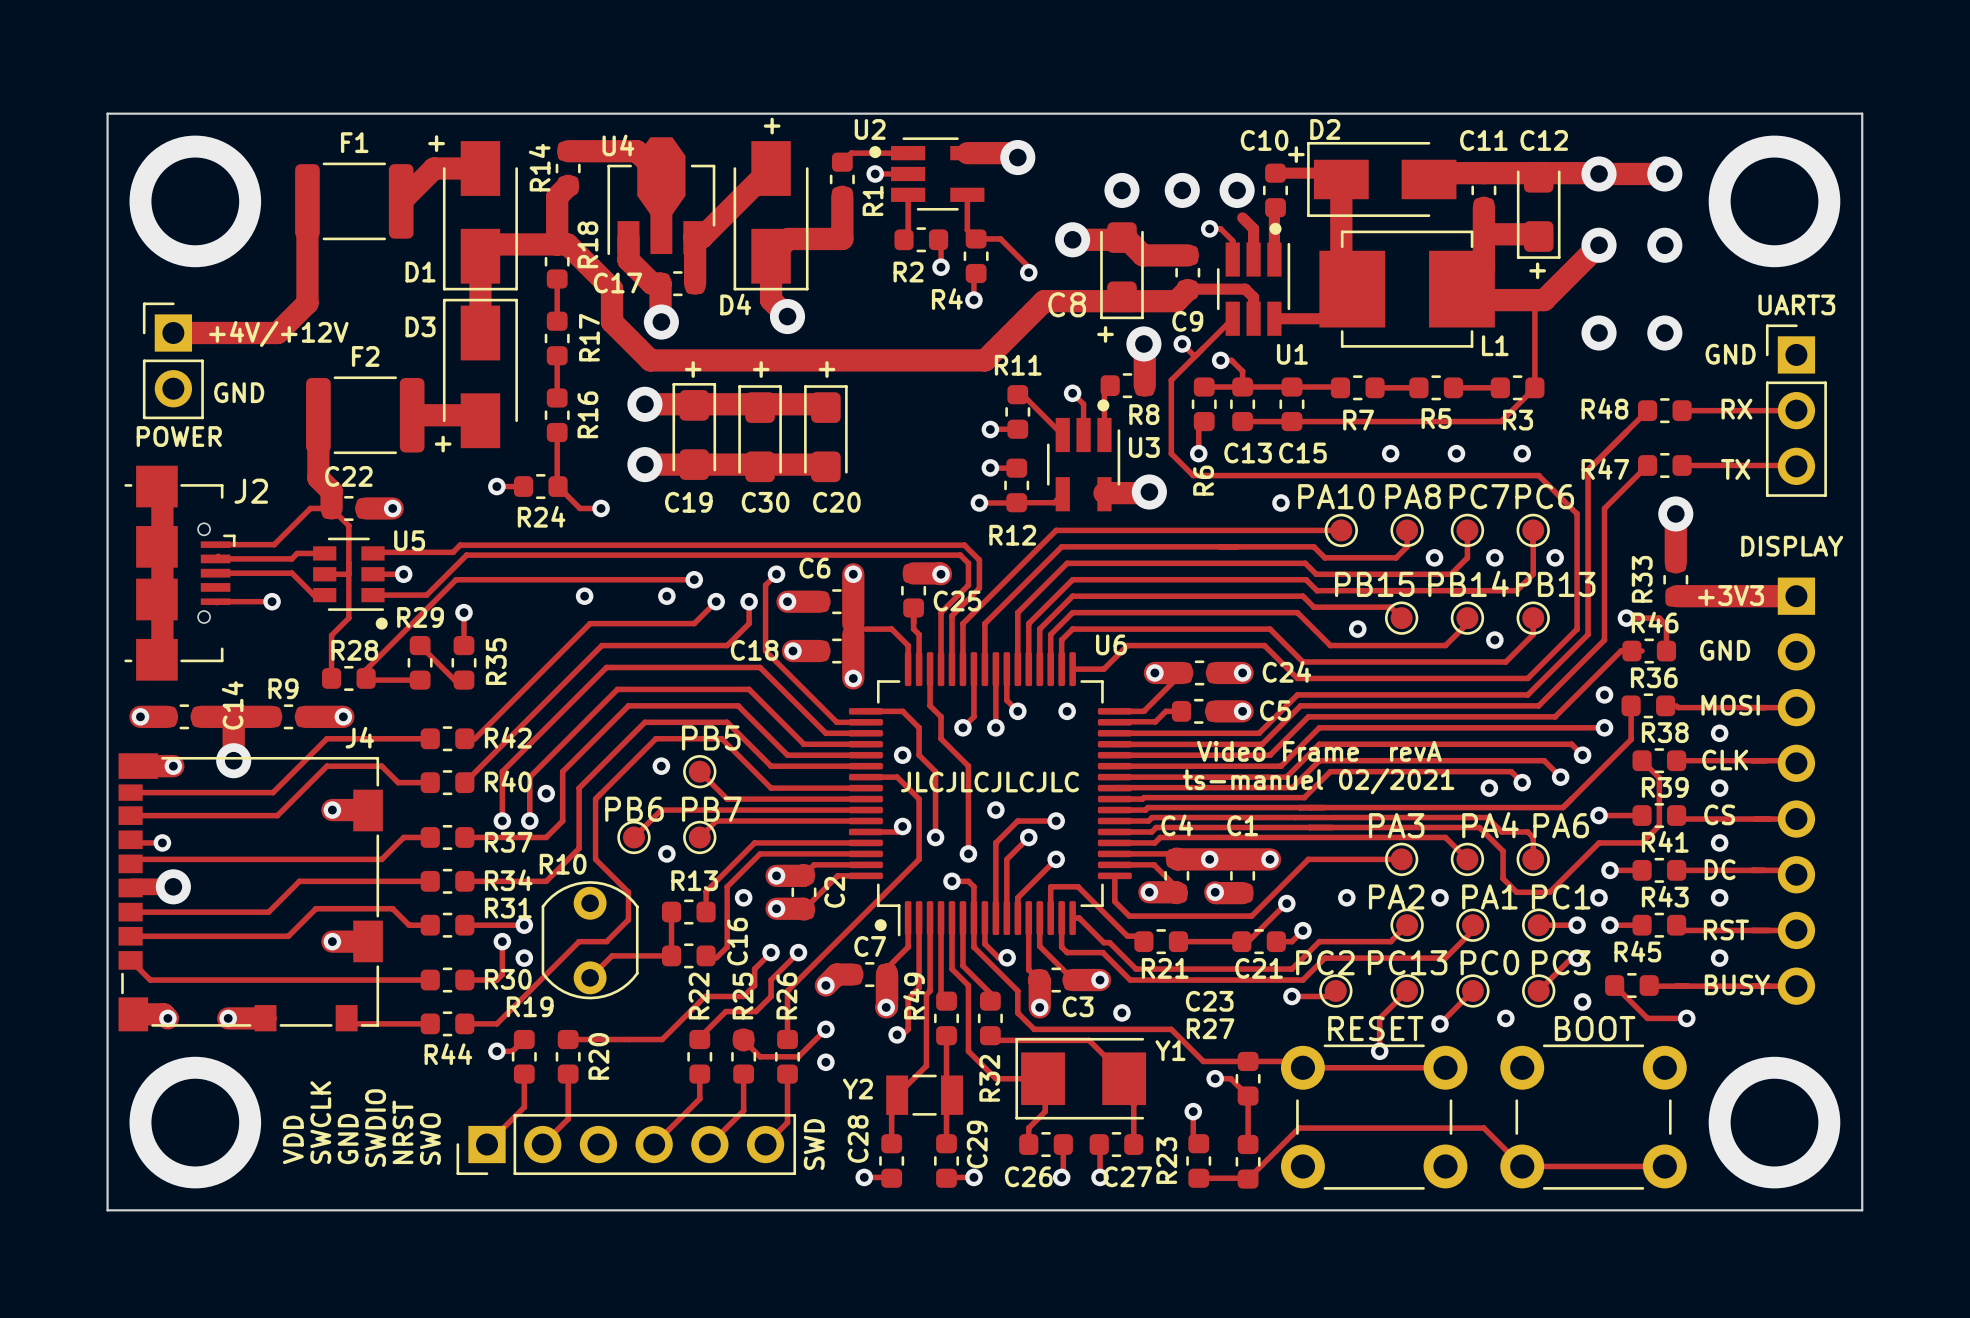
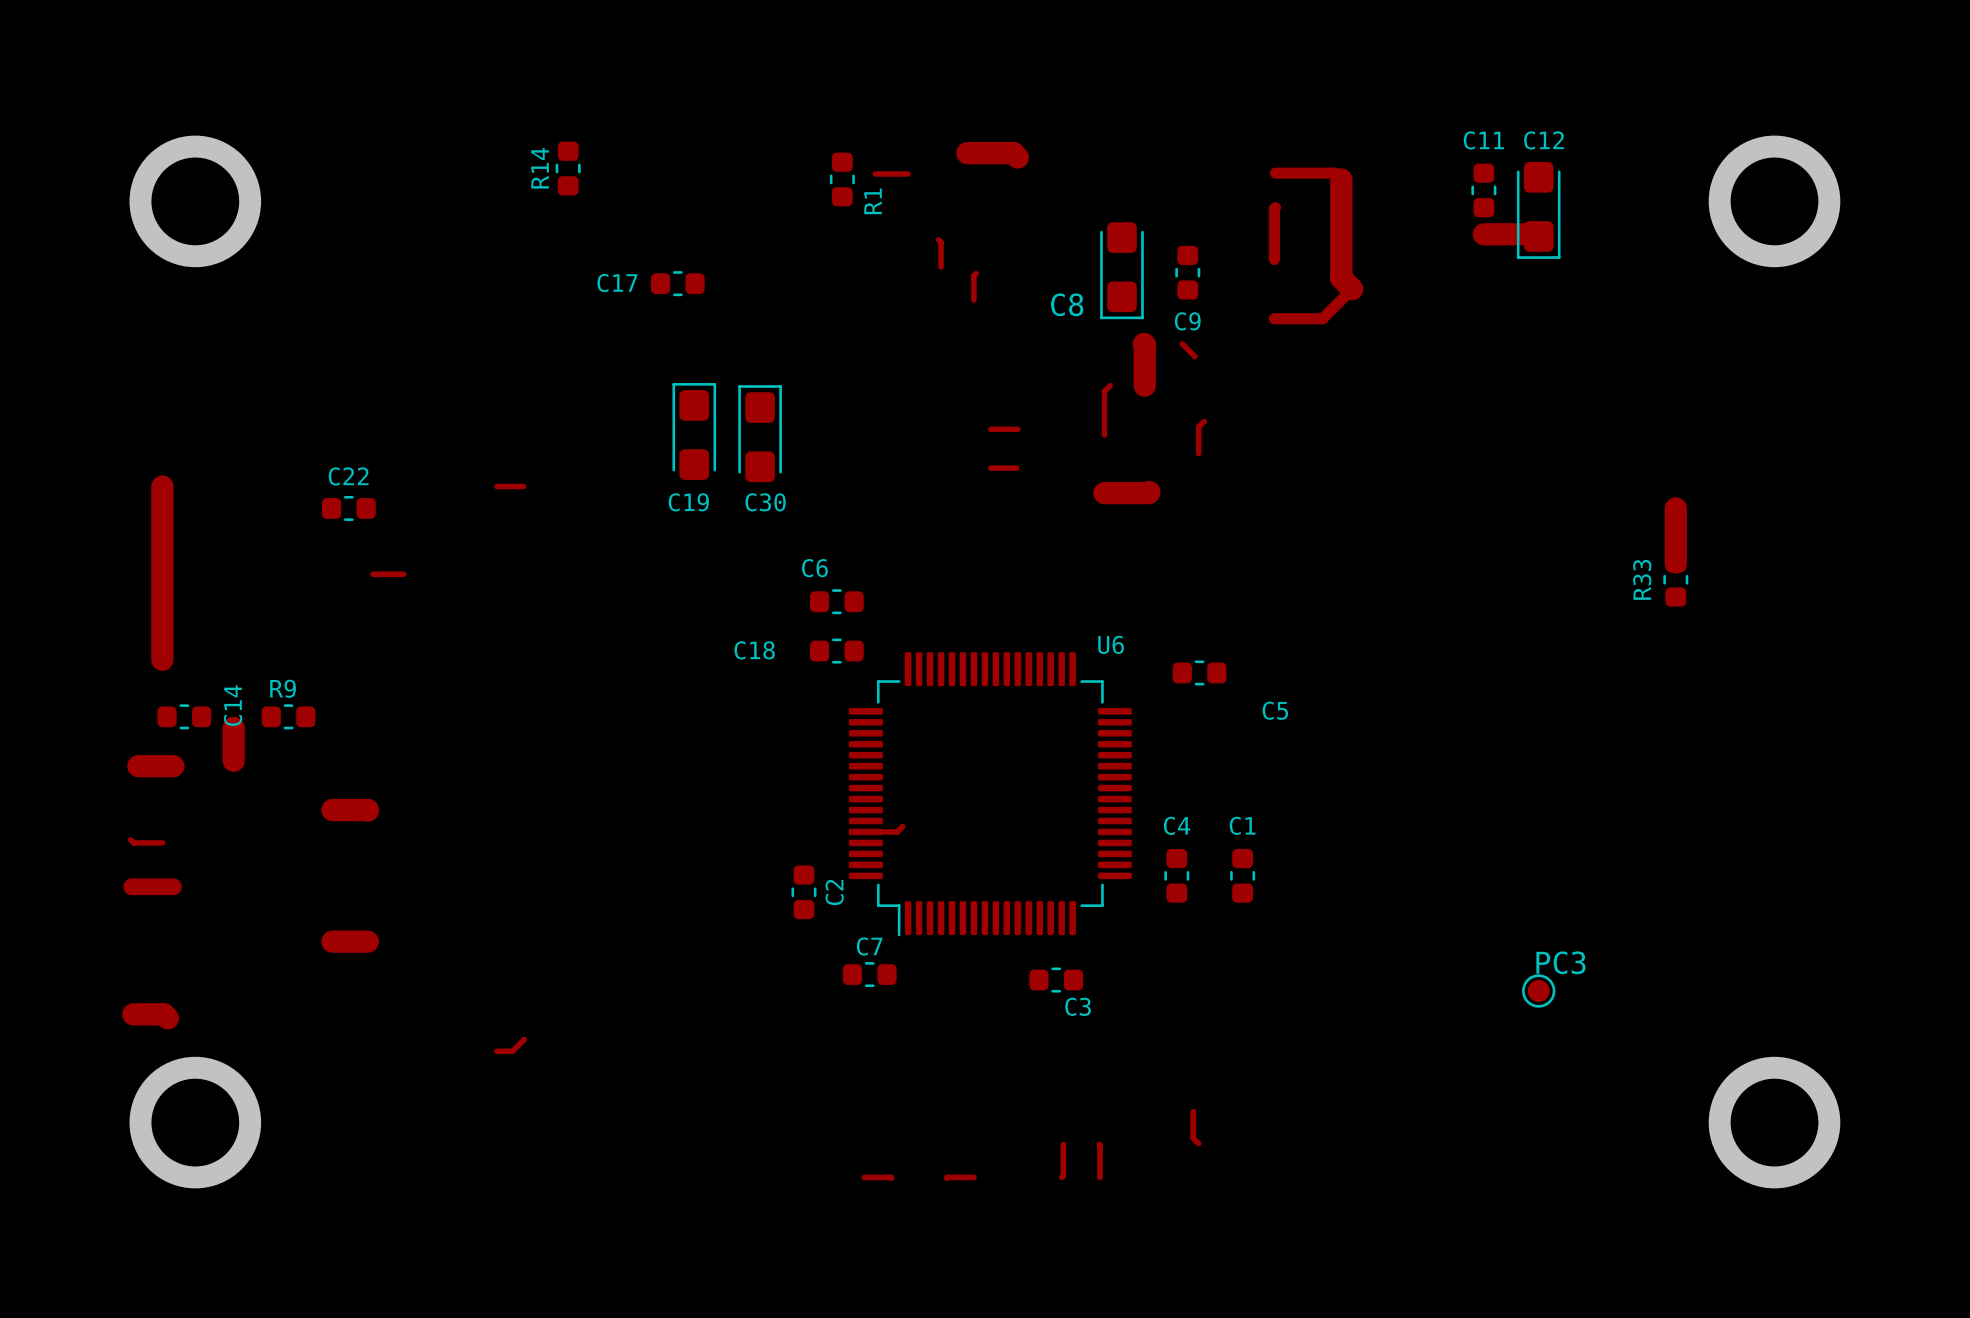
board edge: (107, 113) (1862, 113) (1862, 1210) (107, 1210) (107, 113) -> none
text: + (772, 126) -> none
text: + (436, 143) -> none
drawing: [869, 146, 882, 159] -> none
track: (568, 151) (636, 151) (661, 175) -> none
track: (908, 153) (851, 153) (842, 162) -> none
text: + (1296, 154) -> none
via: (1017, 157) -> none
track: (480, 168) (434, 168) (401, 201) -> none
track: (771, 168) (702, 237) (694, 237) (695, 283) -> none
via: (875, 173) -> none
U2: (937, 173) -> none
via: (1599, 173) -> none
track: (1664, 173) (1435, 173) (1429, 179) -> none
via: (1664, 173) -> none
D2: (1381, 179) -> none
track: (568, 185) (557, 196) (557, 244) -> none
via: (1121, 190) -> none
via: (1182, 190) -> none
via: (1237, 190) -> none
C10: (1275, 190) -> none
track: (908, 194) (908, 235) (904, 239) -> none
track: (967, 194) (967, 230) (976, 238) (1000, 238) (1028, 267) (1028, 272) -> none
U4: (661, 196) -> none
track: (842, 196) (842, 238) (788, 238) (771, 256) (771, 300) (787, 316) -> none
track: (307, 201) (307, 303) (277, 333) (173, 333) -> none
F1: (354, 201) -> none
track: (1483, 207) (1483, 267) (1461, 289) (1472, 300) (1544, 300) (1599, 245) -> none
D1: (480, 215) -> none
D4: (771, 215) -> none
track: (1242, 217) (1253, 228) (1253, 259) -> none
drawing: [1269, 222, 1282, 235] -> none
track: (1209, 228) (1220, 228) (1232, 240) (1232, 259) -> none
via: (1209, 228) -> none
track: (628, 237) (628, 260) (652, 283) (660, 283) (661, 322) -> none
R2: (921, 239) -> none
track: (1072, 239) (1127, 239) (1143, 255) (1187, 255) -> none
via: (1072, 239) -> none
via: (1599, 245) -> none
via: (1664, 245) -> none
R4: (976, 256) -> none
R18: (557, 261) -> none
via: (941, 267) -> none
text: + (1537, 270) -> none
via: (1028, 272) -> none
track: (557, 278) (557, 321) -> none
U1: (1253, 289) -> none
L1: (1407, 289) -> none
via: (973, 300) -> none
track: (1538, 300) (1534, 303) (1534, 387) (1501, 421) (1242, 421) -> none
text: UART3 (1796, 304) -> none
via: (787, 316) -> none
track: (1232, 318) (1171, 380) (1171, 453) (1193, 475) (1538, 475) (1577, 513) (1577, 629) (1527, 678) (1297, 678) (1264, 645) (1127, 645) (1103, 669) (1072, 669) -> none
track: (1253, 318) (1253, 297) (1245, 289) (1188, 289) (1176, 301) (1044, 301) (984, 360) (650, 360) (612, 322) (612, 288) (567, 244) (492, 244) (480, 256) (480, 333) -> none
via: (661, 322) -> none
via: (1599, 333) -> none
via: (1664, 333) -> none
text: +4V/+12V (278, 334) -> none
text: + (1105, 334) -> none
R17: (557, 338) -> none
via: (1143, 343) -> none
via: (1182, 343) -> none
text: GND (1730, 354) -> none
track: (557, 355) (557, 397) -> none
part: (173, 360) -> none
track: (1220, 360) (1231, 360) (1242, 371) (1242, 387) -> none
via: (1220, 360) -> none
text: + (693, 369) -> none
text: + (761, 369) -> none
text: + (826, 369) -> none
D3: (480, 373) -> none
R8: (1127, 385) -> none
track: (1204, 387) (1340, 387) -> none
R7: (1357, 387) -> none
track: (1375, 387) (1418, 387) -> none
R5: (1436, 387) -> none
track: (1453, 387) (1500, 387) -> none
R3: (1517, 387) -> none
text: GND (239, 392) -> none
track: (1072, 393) (1083, 404) (1083, 434) -> none
via: (1072, 393) -> none
track: (1017, 394) (1022, 394) (1062, 434) -> none
drawing: [1097, 399, 1110, 412] -> none
track: (644, 404) (822, 404) (825, 407) -> none
via: (644, 404) -> none
R6: (1204, 404) -> none
C13: (1242, 404) -> none
C15: (1291, 404) -> none
text: RX (1736, 409) -> none
track: (1647, 410) (1588, 470) (1588, 634) (1527, 694) (1297, 694) (1259, 733) (1114, 733) -> none
R48: (1664, 410) -> none
track: (1682, 410) (1796, 410) -> none
part: (1796, 410) -> none
R11: (1017, 411) -> none
track: (318, 415) (318, 478) (331, 491) (331, 508) -> none
F2: (365, 415) -> none
track: (412, 415) (474, 415) (480, 420) -> none
R16: (557, 415) -> none
via: (990, 429) -> none
track: (557, 432) (557, 485) (579, 508) (601, 508) -> none
C20: (825, 433) -> none
text: POWER (179, 436) -> none
text: + (443, 444) -> none
via: (1198, 453) -> none
via: (1390, 453) -> none
via: (1456, 453) -> none
via: (1522, 453) -> none
track: (644, 464) (823, 464) (825, 466) -> none
via: (644, 464) -> none
U3: (1083, 464) -> none
track: (1647, 465) (1604, 508) (1604, 640) (1538, 705) (1300, 705) (1262, 744) (1114, 744) -> none
R47: (1664, 465) -> none
track: (1682, 465) (1796, 466) -> none
via: (990, 467) -> none
text: TX (1735, 469) -> none
R12: (1016, 485) -> none
via: (496, 486) -> none
R24: (540, 486) -> none
via: (1149, 492) -> none
track: (1062, 494) (1054, 502) (1016, 502) -> none
track: (979, 502) (1016, 502) -> none
via: (979, 502) -> none
via: (1281, 502) -> none
track: (331, 508) (310, 508) (274, 544) (215, 544) -> none
track: (331, 508) (348, 525) (348, 574) (324, 574) -> none
track: (366, 508) (392, 508) -> none
via: (392, 508) -> none
via: (601, 508) -> none
via: (1675, 513) -> none
track: (1341, 530) (1056, 530) (962, 623) (962, 669) -> none
part: PA10 (1341, 530) -> none
track: (1407, 530) (1407, 546) (1396, 557) (1324, 557) (1313, 546) (1061, 546) (984, 623) (984, 669) -> none
part: PA8 (1407, 530) -> none
track: (1467, 530) (1467, 557) (1450, 574) (1316, 574) (1305, 563) (1067, 563) (1017, 612) (1017, 669) -> none
part: PC7 (1467, 530) -> none
track: (1533, 530) (1533, 574) (1516, 590) (1317, 590) (1306, 579) (1072, 579) (1028, 623) (1028, 669) -> none
part: PC6 (1533, 530) -> none
text: DISPLAY (1792, 546) -> none
track: (323, 552) (324, 553) (297, 553) (291, 558) (215, 558) (218, 556) -> none
track: (372, 553) (453, 552) (460, 545) (964, 545) (979, 560) (979, 588) (952, 615) (952, 669) -> none
via: (1434, 557) -> none
via: (1494, 557) -> none
via: (1555, 557) -> none
track: (348, 563) (348, 618) (331, 635) (331, 678) -> none
J2: (179, 573) -> none
track: (215, 573) (291, 573) (313, 595) (324, 595) -> none
track: (913, 573) (941, 574) -> none
U5: (348, 574) -> none
via: (403, 574) -> none
track: (776, 574) (765, 585) (765, 651) (836, 722) (865, 722) -> none
via: (776, 574) -> none
track: (853, 574) (853, 623) -> none
via: (853, 574) -> none
via: (941, 574) -> none
track: (694, 579) (456, 579) (366, 669) (367, 680) (420, 680) -> none
via: (694, 579) -> none
C25: (913, 590) -> none
text: +3V3 (1731, 595) -> none
track: (374, 596) (372, 595) (426, 595) (466, 555) (960, 555) (968, 563) (968, 585) (941, 612) (941, 669) -> none
via: (584, 596) -> none
via: (666, 596) -> none
track: (1676, 596) (1796, 596) -> none
track: (272, 601) (215, 601) (216, 602) -> none
via: (272, 601) -> none
track: (716, 601) (694, 623) (590, 623) (474, 738) (464, 738) -> none
via: (716, 601) -> none
track: (749, 601) (749, 623) (727, 645) (601, 645) (464, 782) -> none
via: (749, 601) -> none
track: (787, 601) (819, 601) -> none
via: (787, 601) -> none
track: (913, 602) (913, 629) (919, 634) (919, 669) -> none
track: (463, 612) (463, 645) -> none
via: (463, 612) -> none
drawing: [375, 617, 388, 630] -> none
track: (1401, 618) (1390, 607) (1313, 607) (1302, 596) (1072, 596) (1039, 629) (1039, 669) -> none
part: PB15 (1401, 618) -> none
part: PB14 (1467, 618) -> none
track: (1472, 618) (1445, 645) (1330, 645) (1297, 612) (1072, 612) (1050, 634) (1050, 669) -> none
part: PB13 (1533, 618) -> none
track: (1538, 618) (1533, 623) (1533, 634) (1505, 662) (1302, 662) (1270, 629) (1072, 629) (1061, 640) (1061, 669) -> none
track: (1626, 618) (1659, 618) (1666, 625) (1666, 651) -> none
via: (1626, 618) -> none
track: (865, 629) (891, 629) (908, 645) (908, 669) -> none
via: (1357, 629) -> none
track: (853, 634) (853, 678) -> none
via: (1494, 640) -> none
track: (420, 645) (454, 680) (463, 680) -> none
text: GND (1725, 650) -> none
track: (792, 651) (819, 651) -> none
via: (792, 651) -> none
track: (1642, 651) (1620, 651) (1555, 716) (1308, 716) (1270, 755) (1114, 755) -> none
R46: (1649, 651) -> none
R29: (420, 662) -> none
R35: (463, 662) -> none
track: (930, 669) (930, 705) (941, 716) (941, 738) (968, 766) (968, 853) -> none
track: (973, 669) (973, 716) (962, 727) -> none
track: (995, 669) (995, 727) -> none
track: (1006, 669) (1006, 700) (1017, 711) -> none
track: (1154, 672) (1182, 672) (1143, 711) (1114, 711) -> none
via: (1154, 672) -> none
track: (1216, 672) (1242, 672) -> none
via: (1242, 672) -> none
R28: (348, 678) -> none
via: (853, 678) -> none
via: (1604, 694) -> none
track: (1631, 705) (1631, 739) (1563, 807) (1147, 807) (1145, 810) (1114, 810) -> none
R36: (1648, 705) -> none
track: (1676, 705) (1678, 707) (1796, 707) -> none
text: MOSI (1730, 705) -> none
track: (865, 711) (902, 711) (919, 727) (919, 755) (935, 771) (935, 837) -> none
via: (1017, 711) -> none
via: (1067, 711) -> none
C24: (1198, 711) -> none
track: (1216, 711) (1242, 711) -> none
via: (1242, 711) -> none
track: (140, 716) (167, 716) -> none
via: (140, 716) -> none
track: (201, 716) (271, 716) -> none
track: (305, 716) (343, 716) -> none
via: (343, 716) -> none
track: (1181, 716) (1175, 711) (1165, 711) (1155, 721) (1114, 722) -> none
via: (962, 727) -> none
via: (995, 727) -> none
track: (1604, 727) (1319, 727) (1281, 766) (1114, 766) -> none
via: (1604, 727) -> none
track: (865, 733) (825, 733) (760, 667) (606, 667) (502, 771) (502, 821) -> none
via: (1719, 733) -> none
track: (430, 738) (326, 738) (273, 792) (130, 792) -> none
R42: (447, 738) -> none
track: (865, 744) (803, 744) (749, 689) (617, 689) (529, 777) (529, 821) -> none
text: Video Frame revA (1319, 751) -> none
track: (865, 755) (787, 755) (738, 705) (628, 705) (562, 771) (562, 821) (546, 837) (464, 837) -> none
via: (902, 755) -> none
track: (1582, 755) (1571, 744) (1319, 744) (1286, 777) (1114, 777) -> none
via: (1582, 755) -> none
via: (233, 760) -> none
track: (1642, 760) (1659, 777) (1659, 825) (1642, 842) (1599, 842) (1549, 892) (1516, 892) (1503, 878) (1503, 851) (1479, 827) (1156, 827) (1151, 831) (1114, 831) -> none
R38: (1659, 760) -> none
track: (1676, 760) (1793, 760) (1796, 763) -> none
text: CLK (1725, 760) -> none
via: (173, 766) -> none
via: (661, 766) -> none
track: (865, 766) (771, 766) (727, 722) (644, 722) (579, 788) (579, 848) (546, 881) (464, 881) -> none
track: (699, 771) (727, 799) (865, 799) -> none
part: PB5 (699, 771) -> none
track: (865, 777) (897, 777) (919, 799) (919, 859) (787, 991) (787, 1039) -> none
track: (1560, 777) (1544, 760) (1319, 760) (1292, 787) (1114, 788) -> none
via: (1560, 777) -> none
text: JLCJLCJLCJLC (989, 781) -> none
text: ts-manuel 02/2021 (1318, 781) -> none
track: (430, 782) (398, 782) (381, 766) (326, 766) (277, 815) (130, 815) -> none
R40: (447, 782) -> none
track: (1522, 782) (1511, 771) (1330, 771) (1304, 797) (1114, 799) -> none
via: (1522, 782) -> none
track: (865, 788) (771, 788) (721, 738) (655, 738) (595, 799) (595, 859) (628, 892) (628, 919) (606, 941) (579, 941) (496, 1023) (464, 1023) -> none
via: (1489, 788) -> none
via: (1719, 788) -> none
part: (1796, 791) -> none
via: (546, 793) -> none
via: (332, 810) -> none
track: (865, 810) (661, 810) (633, 837) -> none
via: (995, 810) -> none
text: CS (1719, 814) -> none
track: (1599, 815) (1642, 815) -> none
via: (1599, 815) -> none
R39: (1659, 815) -> none
track: (1676, 815) (1680, 819) (1796, 819) -> none
track: (1328, 817) (1152, 817) (1148, 821) (1114, 821) -> none
track: (1330, 817) (1487, 817) (1501, 831) (1527, 831) (1533, 837) (1533, 859) -> none
via: (502, 821) -> none
via: (529, 821) -> none
track: (865, 821) (716, 821) (699, 837) -> none
track: (1056, 821) (1017, 821) (995, 842) (995, 918) -> none
via: (1056, 821) -> none
via: (902, 826) -> none
track: (430, 837) (403, 837) (381, 859) (135, 859) (130, 863) -> none
R37: (447, 837) -> none
part: PB6 (633, 837) -> none
part: PB7 (699, 837) -> none
via: (935, 837) -> none
track: (1028, 837) (1006, 859) (1006, 918) -> none
via: (1028, 837) -> none
via: (162, 842) -> none
track: (865, 842) (754, 842) (706, 891) (706, 912) -> none
track: (1114, 842) (1154, 842) (1160, 837) (1445, 837) (1467, 859) -> none
via: (1719, 842) -> none
via: (666, 853) -> none
track: (865, 853) (760, 853) (727, 886) (727, 947) (716, 958) -> none
via: (968, 853) -> none
track: (1176, 853) (1114, 853) -> none
track: (1176, 858) (1270, 859) -> none
track: (1056, 859) (1017, 897) (1017, 918) -> none
via: (1056, 859) -> none
via: (1209, 859) -> none
via: (1270, 859) -> none
track: (1401, 859) (1308, 859) (1251, 916) (1129, 916) (1114, 901) (1114, 875) -> none
part: PA3 (1401, 859) -> none
part: PA4 (1467, 859) -> none
part: PA6 (1533, 859) -> none
track: (865, 864) (814, 864) (803, 875) (776, 875) -> none
track: (1114, 864) (1154, 864) (1176, 887) -> none
text: DC (1720, 869) -> none
track: (1609, 870) (1642, 870) -> none
via: (1609, 870) -> none
R41: (1659, 870) -> none
track: (1676, 870) (1792, 870) (1796, 874) -> none
via: (776, 875) -> none
track: (865, 875) (837, 875) (803, 909) (776, 908) -> none
track: (430, 881) (299, 881) (268, 912) (130, 912) -> none
R34: (447, 881) -> none
track: (952, 881) (968, 881) (973, 886) (973, 947) (1017, 991) (1017, 1012) (1034, 1029) (1171, 1029) (1203, 1061) (1296, 1061) (1302, 1067) (1445, 1067) -> none
via: (952, 881) -> none
via: (173, 886) -> none
J4: (250, 892) -> none
track: (1149, 892) (1176, 893) -> none
via: (1149, 892) -> none
track: (1215, 892) (1242, 893) -> none
via: (1215, 892) -> none
via: (743, 897) -> none
via: (1346, 897) -> none
via: (1440, 897) -> none
via: (1599, 897) -> none
via: (1719, 897) -> none
track: (1286, 903) (1248, 941) (1183, 941) (1178, 936) -> none
via: (1286, 903) -> none
via: (776, 908) -> none
track: (671, 912) (671, 955) (612, 955) (590, 977) -> none
R13: (688, 912) -> none
track: (908, 918) (908, 947) (887, 968) (886, 1007) -> none
track: (919, 918) (919, 987) (908, 998) (908, 1029) (902, 1034) (897, 1034) -> none
track: (930, 918) (930, 991) (926, 994) (926, 1065) (891, 1100) (891, 1143) -> none
track: (941, 918) (941, 995) (946, 1001) -> none
track: (952, 918) (952, 969) (968, 985) (968, 1051) (995, 1078) (1026, 1078) (1045, 1097) (1045, 1111) (1028, 1128) (1028, 1144) -> none
track: (962, 918) (962, 965) (990, 993) (990, 1001) -> none
track: (984, 918) (984, 944) (998, 958) (1006, 958) -> none
track: (1028, 918) (1028, 969) (1039, 980) (1039, 1007) -> none
track: (1039, 918) (1039, 946) (1073, 980) (1100, 980) -> none
track: (1050, 918) (1050, 886) (1078, 886) (1127, 936) (1143, 936) -> none
track: (1061, 918) (1061, 947) (1067, 952) (1102, 952) (1130, 980) (1302, 980) (1324, 958) (1445, 958) (1472, 930) (1472, 925) -> none
track: (1072, 918) (1079, 918) (1103, 942) (1109, 942) (1136, 969) (1291, 969) (1319, 941) (1390, 941) (1407, 925) -> none
drawing: [874, 919, 887, 932] -> none
track: (430, 925) (409, 925) (392, 908) (315, 908) (288, 936) (130, 936) -> none
R31: (447, 925) -> none
track: (464, 925) (524, 925) -> none
via: (524, 925) -> none
part: PA2 (1407, 925) -> none
part: PA1 (1472, 925) -> none
track: (1538, 925) (1577, 925) -> none
part: PC1 (1538, 925) -> none
via: (1577, 925) -> none
track: (1609, 925) (1642, 925) -> none
via: (1609, 925) -> none
R43: (1659, 925) -> none
track: (1676, 925) (1681, 930) (1796, 930) -> none
track: (1302, 930) (1291, 941) (1281, 941) -> none
via: (1302, 930) -> none
text: RST (1726, 930) -> none
R10: (590, 940) -> none
via: (332, 941) -> none
track: (502, 941) (502, 974) (496, 980) (464, 980) -> none
via: (502, 941) -> none
R21: (1161, 941) -> none
C21: (1259, 941) -> none
track: (771, 952) (754, 969) (754, 985) (743, 996) (705, 996) (662, 1039) (568, 1039) -> none
via: (771, 952) -> none
track: (798, 952) (771, 980) (771, 996) (755, 1011) (725, 1011) (699, 1039) -> none
via: (798, 952) -> none
C16: (688, 955) -> none
via: (1007, 957) -> none
via: (524, 958) -> none
track: (1577, 958) (1571, 958) (1538, 991) -> none
via: (1577, 958) -> none
via: (1719, 958) -> none
track: (130, 960) (150, 980) (430, 980) -> none
track: (852, 974) (836, 974) (825, 985) -> none
R30: (447, 980) -> none
via: (1100, 980) -> none
track: (1649, 984) (1796, 986) -> none
text: BUSY (1737, 984) -> none
via: (825, 985) -> none
track: (1614, 985) (1647, 1018) (1686, 1018) -> none
R45: (1631, 985) -> none
track: (1335, 991) (1330, 996) (1291, 996) -> none
part: PC2 (1335, 991) -> none
track: (1407, 991) (1379, 1018) (1379, 1051) -> none
part: PC13 (1407, 991) -> none
track: (1472, 991) (1440, 1023) -> none
part: PC0 (1472, 991) -> none
via: (1291, 996) -> none
via: (1582, 1001) -> none
via: (886, 1007) -> none
via: (1039, 1007) -> none
via: (1121, 1012) -> none
via: (167, 1018) -> none
track: (228, 1018) (265, 1018) -> none
via: (228, 1018) -> none
track: (346, 1018) (352, 1023) (430, 1023) -> none
R49: (946, 1018) -> none
R32: (990, 1018) -> none
via: (1505, 1018) -> none
via: (1686, 1018) -> none
R44: (447, 1023) -> none
via: (1440, 1023) -> none
track: (825, 1029) (798, 1056) (760, 1056) (743, 1039) -> none
via: (825, 1029) -> none
via: (897, 1034) -> none
track: (946, 1035) (946, 1089) (952, 1095) (946, 1100) (946, 1143) -> none
track: (990, 1035) (995, 1040) (1089, 1040) (1124, 1075) (1124, 1095) -> none
via: (496, 1051) -> none
via: (1379, 1051) -> none
R19: (524, 1056) -> none
R20: (568, 1056) -> none
R22: (699, 1056) -> none
R25: (743, 1056) -> none
R26: (787, 1056) -> none
via: (825, 1062) -> none
track: (524, 1074) (524, 1107) (487, 1144) -> none
track: (568, 1074) (568, 1119) (542, 1144) -> none
track: (699, 1074) (699, 1098) (654, 1144) -> none
track: (743, 1074) (743, 1110) (709, 1144) -> none
track: (787, 1074) (787, 1122) (765, 1144) -> none
Y1: (1080, 1078) -> none
track: (1215, 1078) (1230, 1078) (1248, 1096) (1248, 1144) -> none
via: (1215, 1078) -> none
C23: (1248, 1078) -> none
track: (1122, 1093) (1133, 1104) (1133, 1144) -> none
Y2: (924, 1095) -> none
via: (1193, 1111) -> none
part: RESET (1374, 1117) -> none
part: BOOT (1593, 1117) -> none
text: SWCLK (320, 1122) -> none
text: SWDIO (375, 1128) -> none
text: NRST (403, 1132) -> none
text: VDD (293, 1139) -> none
text: GND (348, 1139) -> none
text: SWO (430, 1139) -> none
part: (626, 1144) -> none
text: SWD (814, 1144) -> none
C26: (1046, 1144) -> none
C27: (1116, 1144) -> none
C28: (891, 1160) -> none
C29: (946, 1160) -> none
R23: (1198, 1160) -> none
R27: (1248, 1161) -> none
track: (1664, 1166) (1522, 1166) (1483, 1128) (1299, 1128) (1248, 1179) (1198, 1178) -> none
via: (864, 1177) -> none
via: (973, 1177) -> none
via: (1061, 1177) -> none
via: (1100, 1177) -> none

